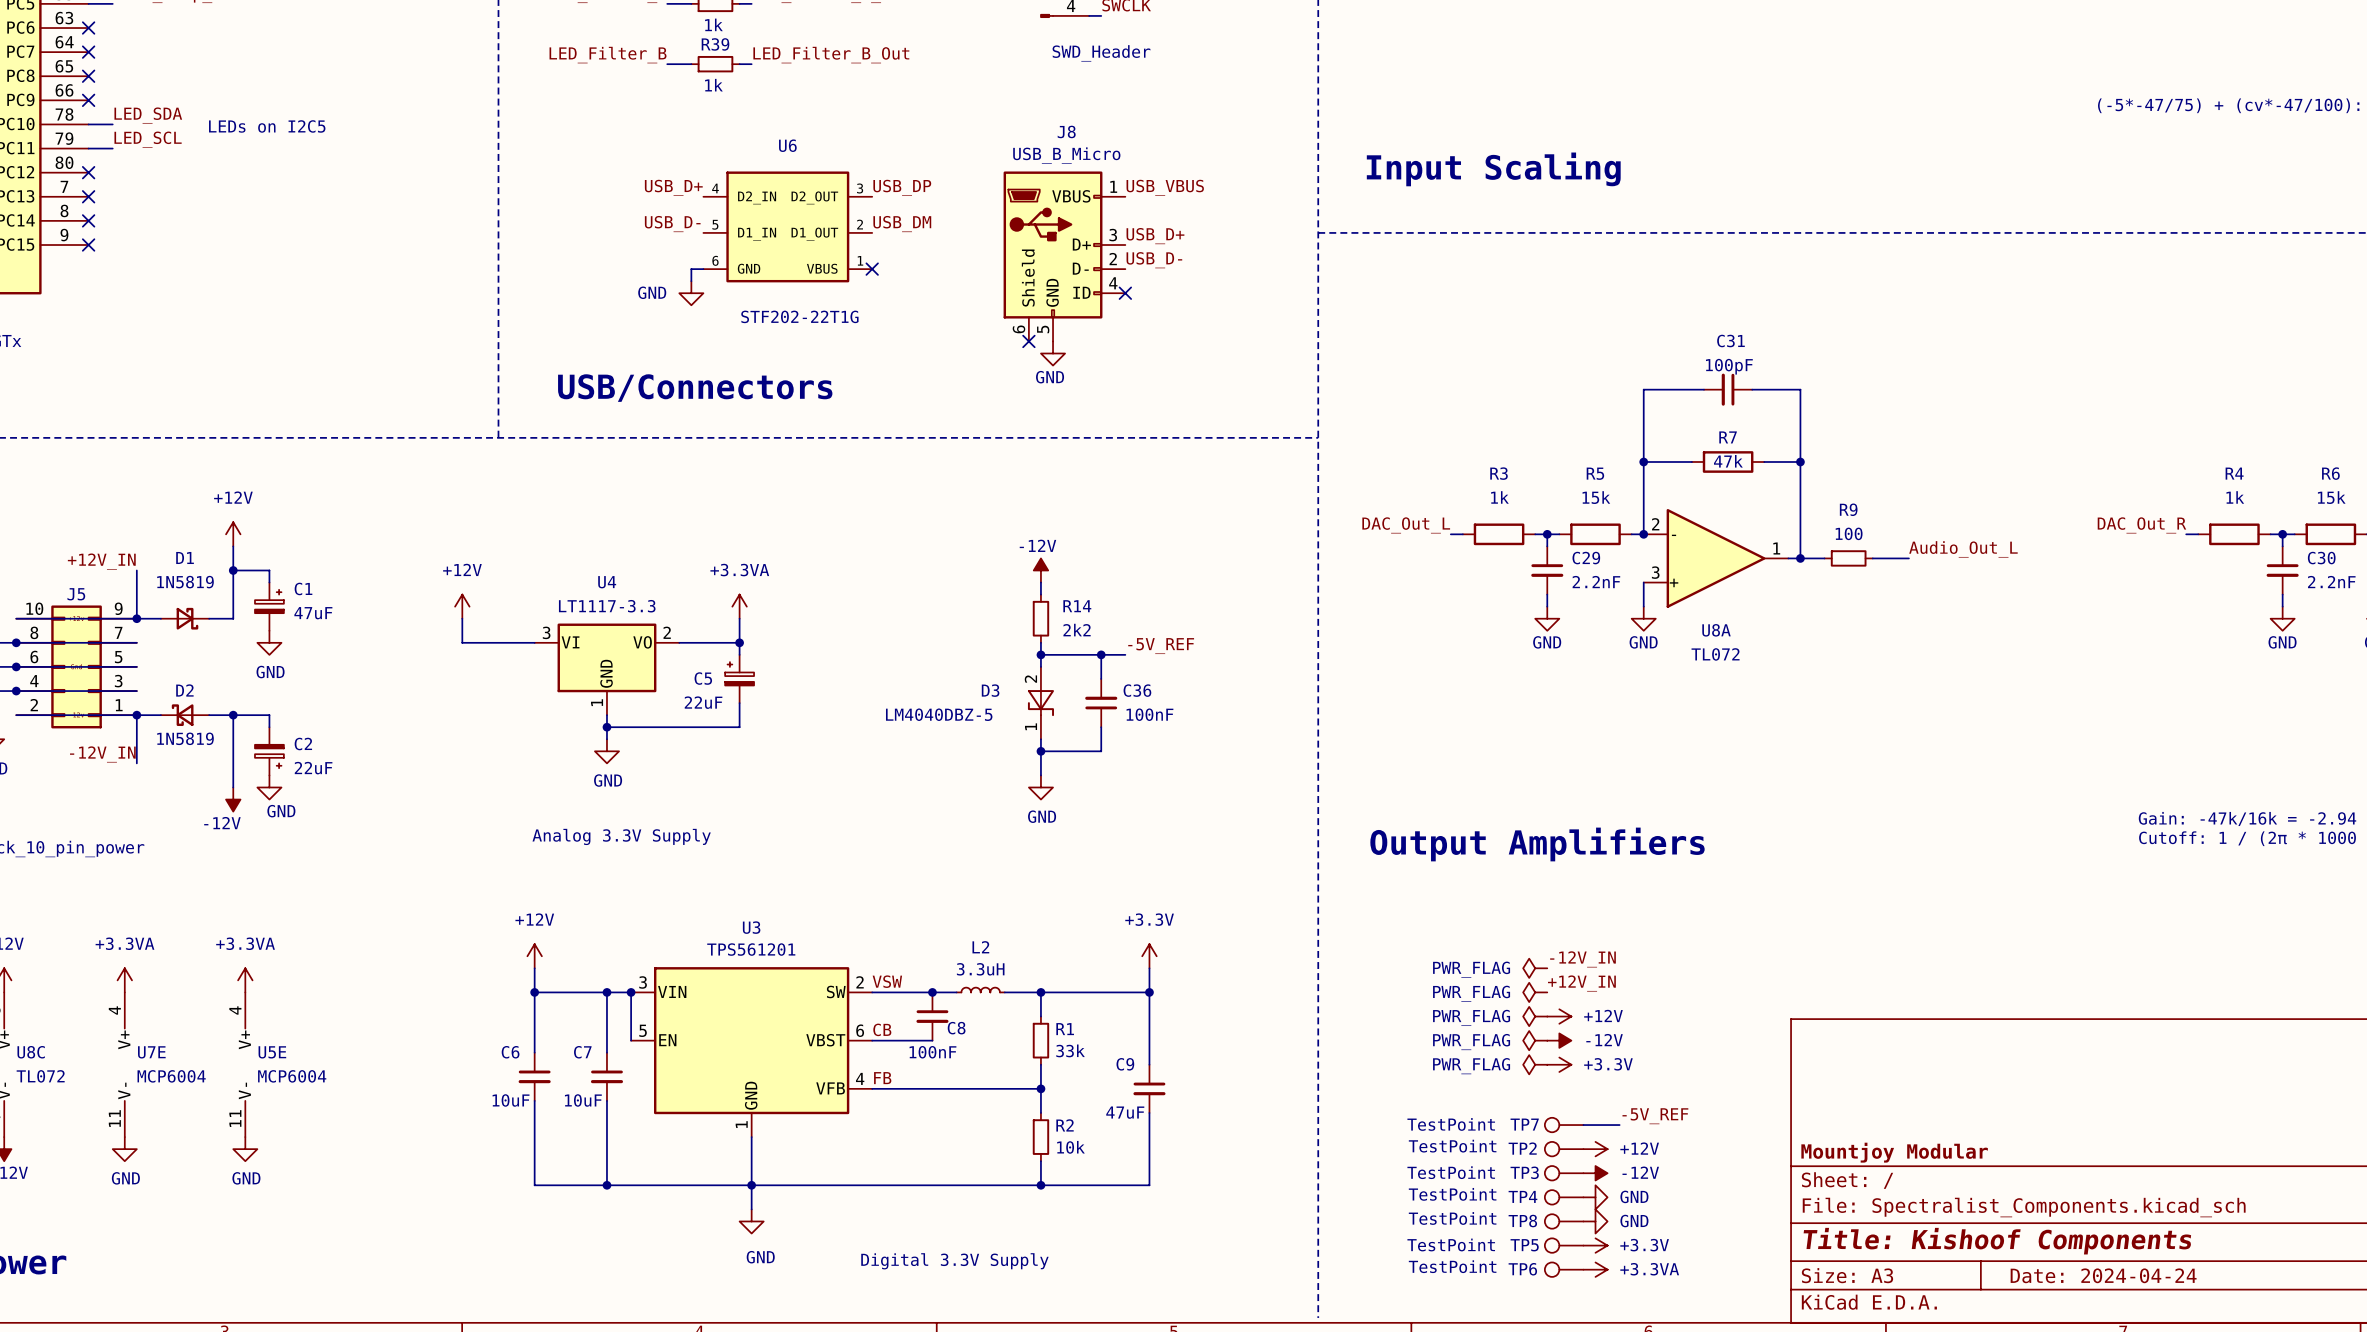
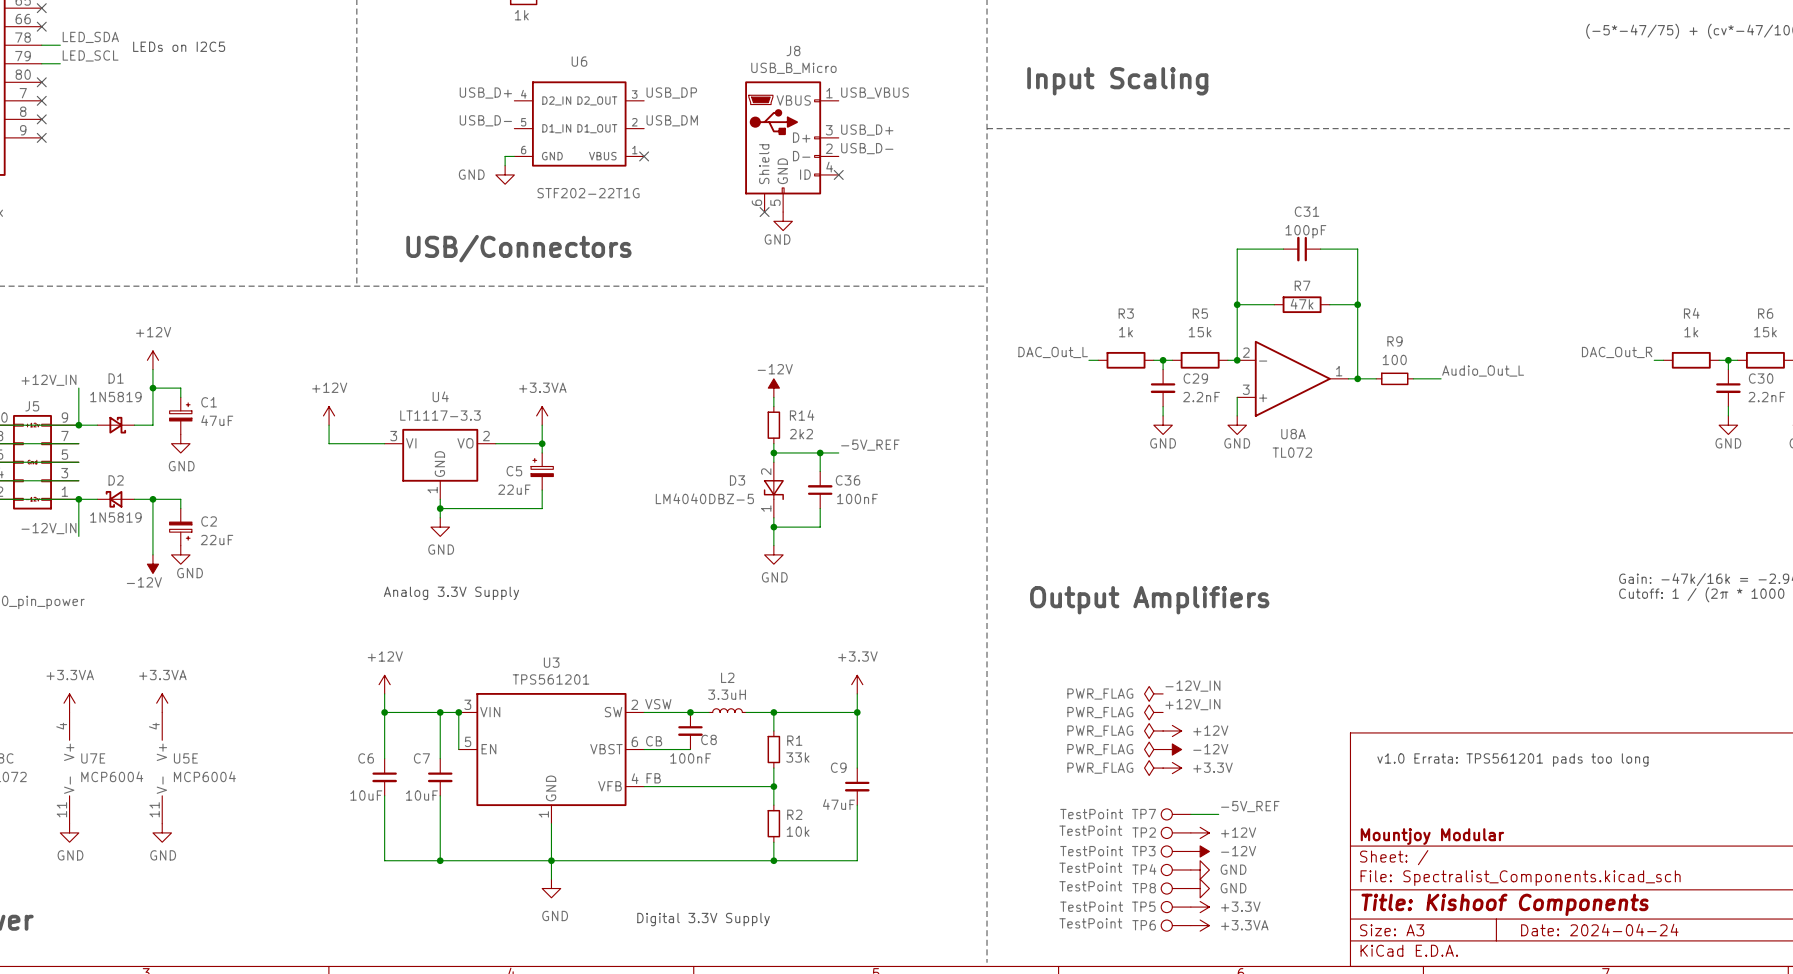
text: none -> v1.0 Errata: TPS561201 pads too long (1512, 760)

